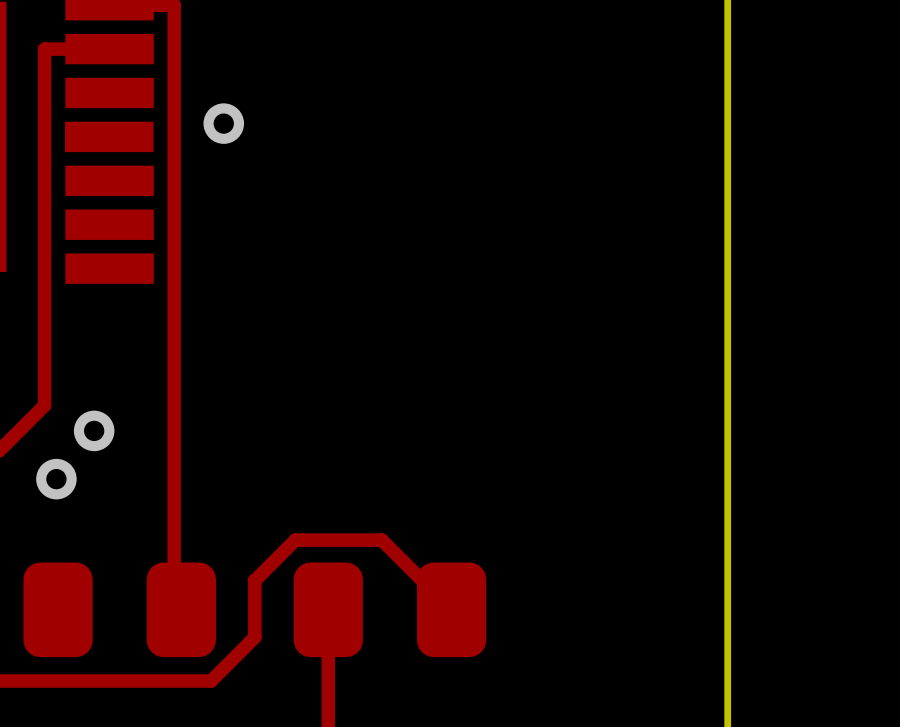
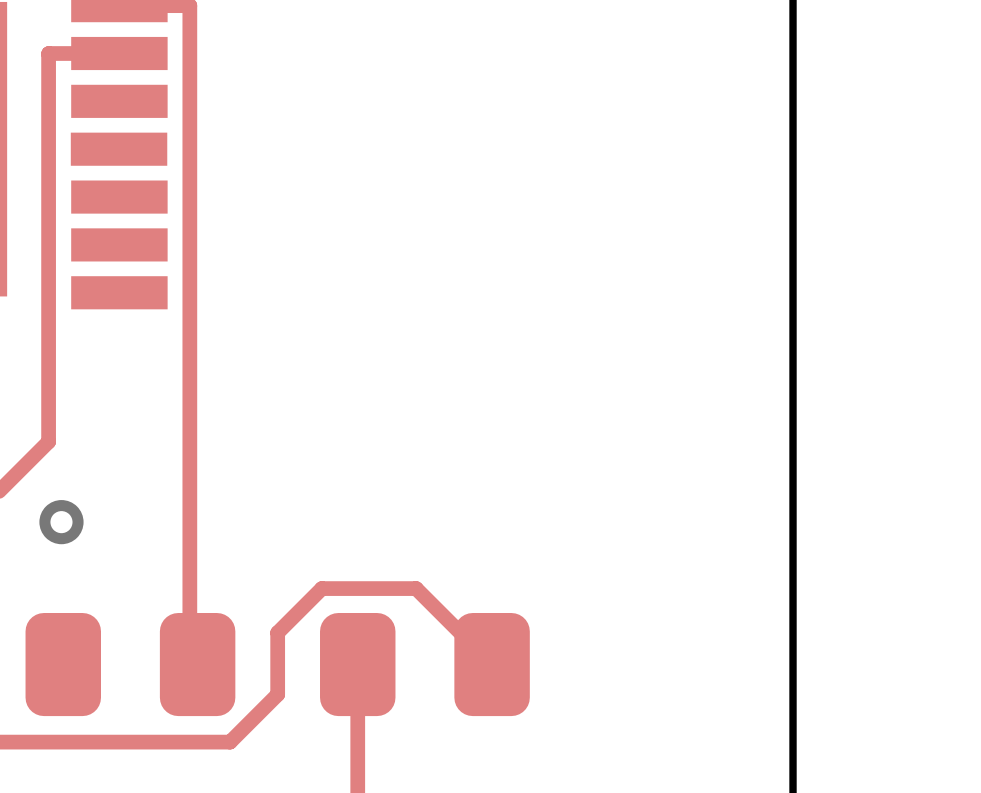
via: (223, 123) -> none
via: (94, 430) -> none

